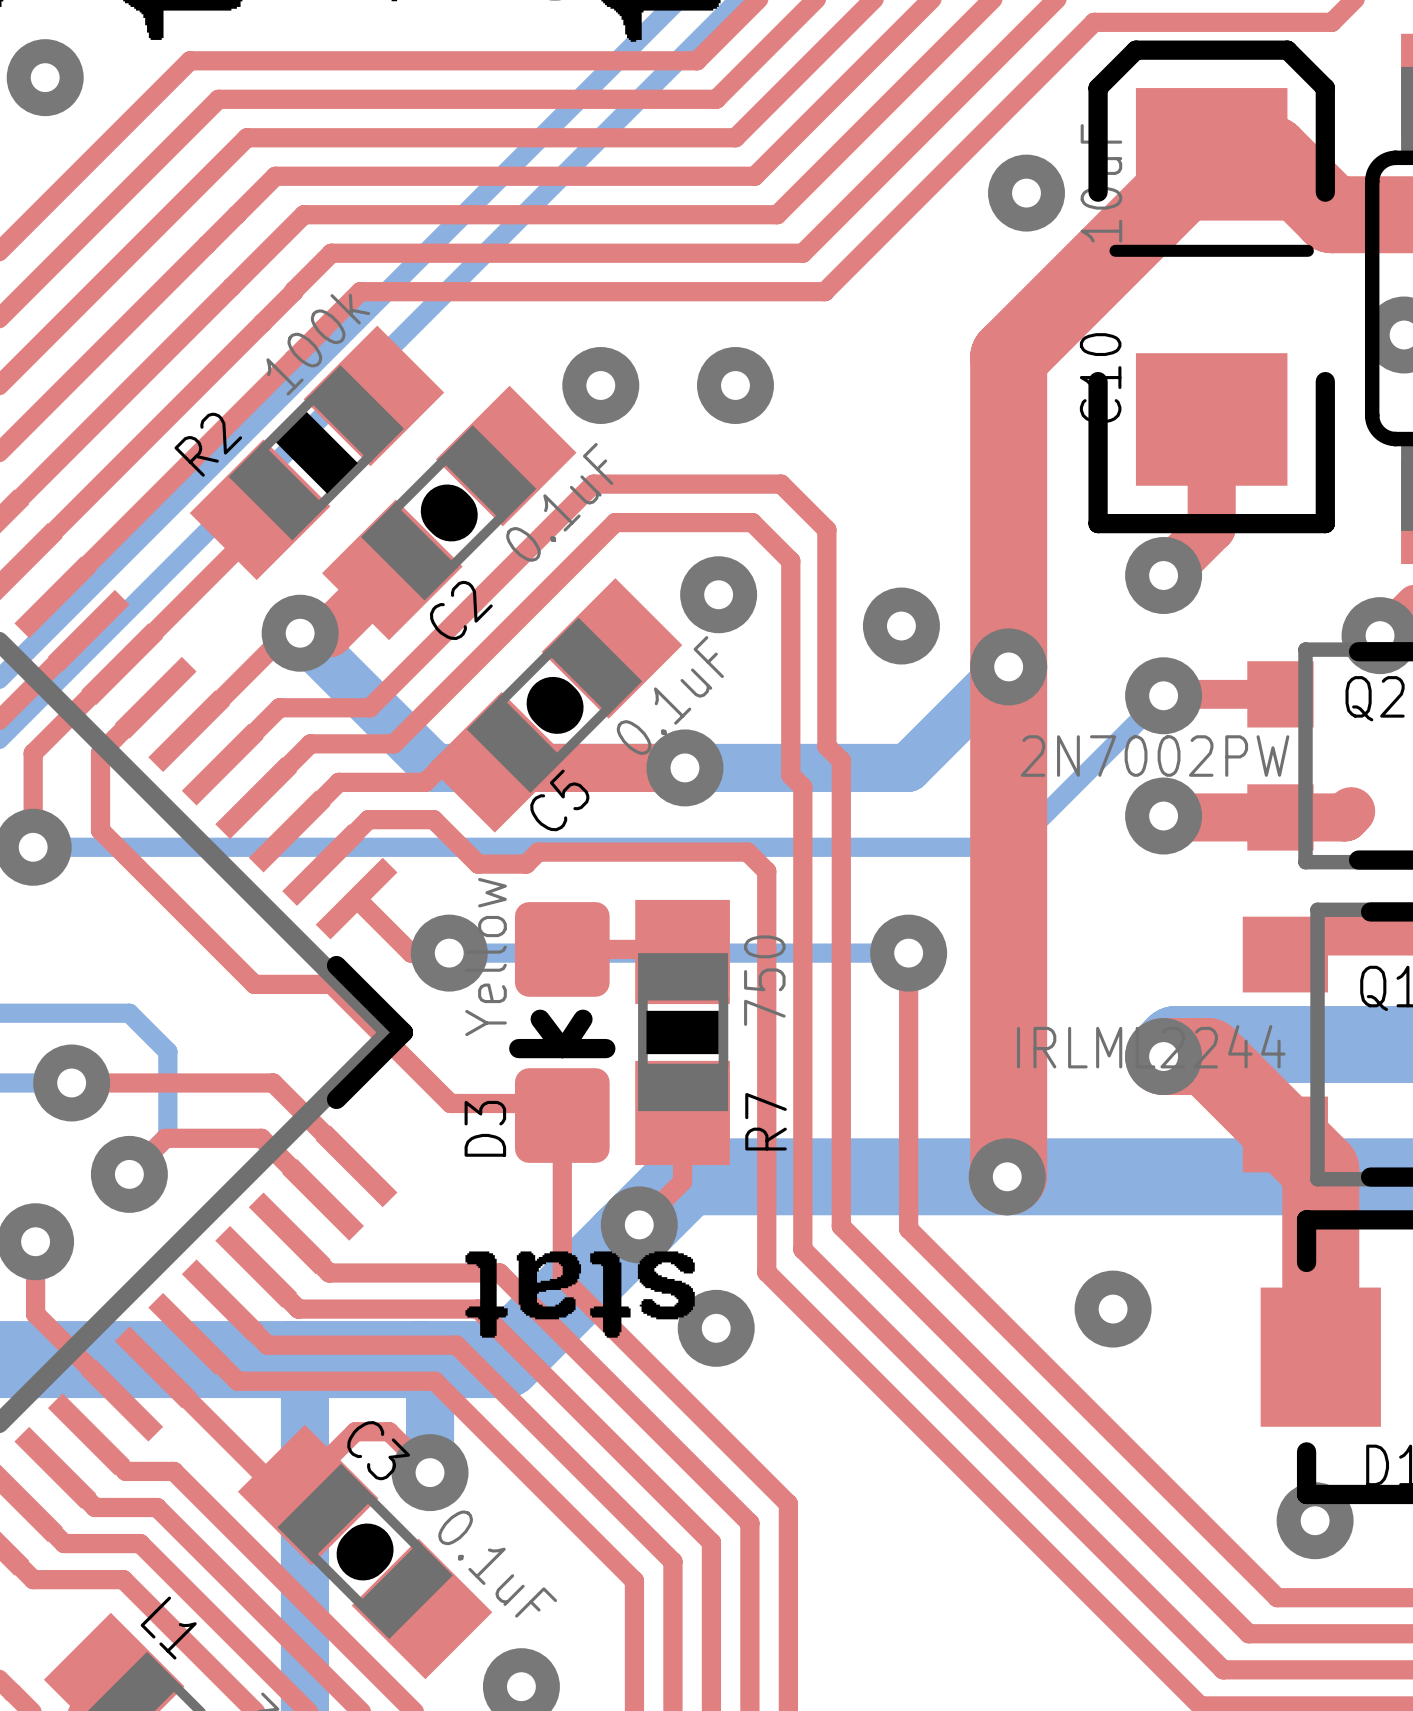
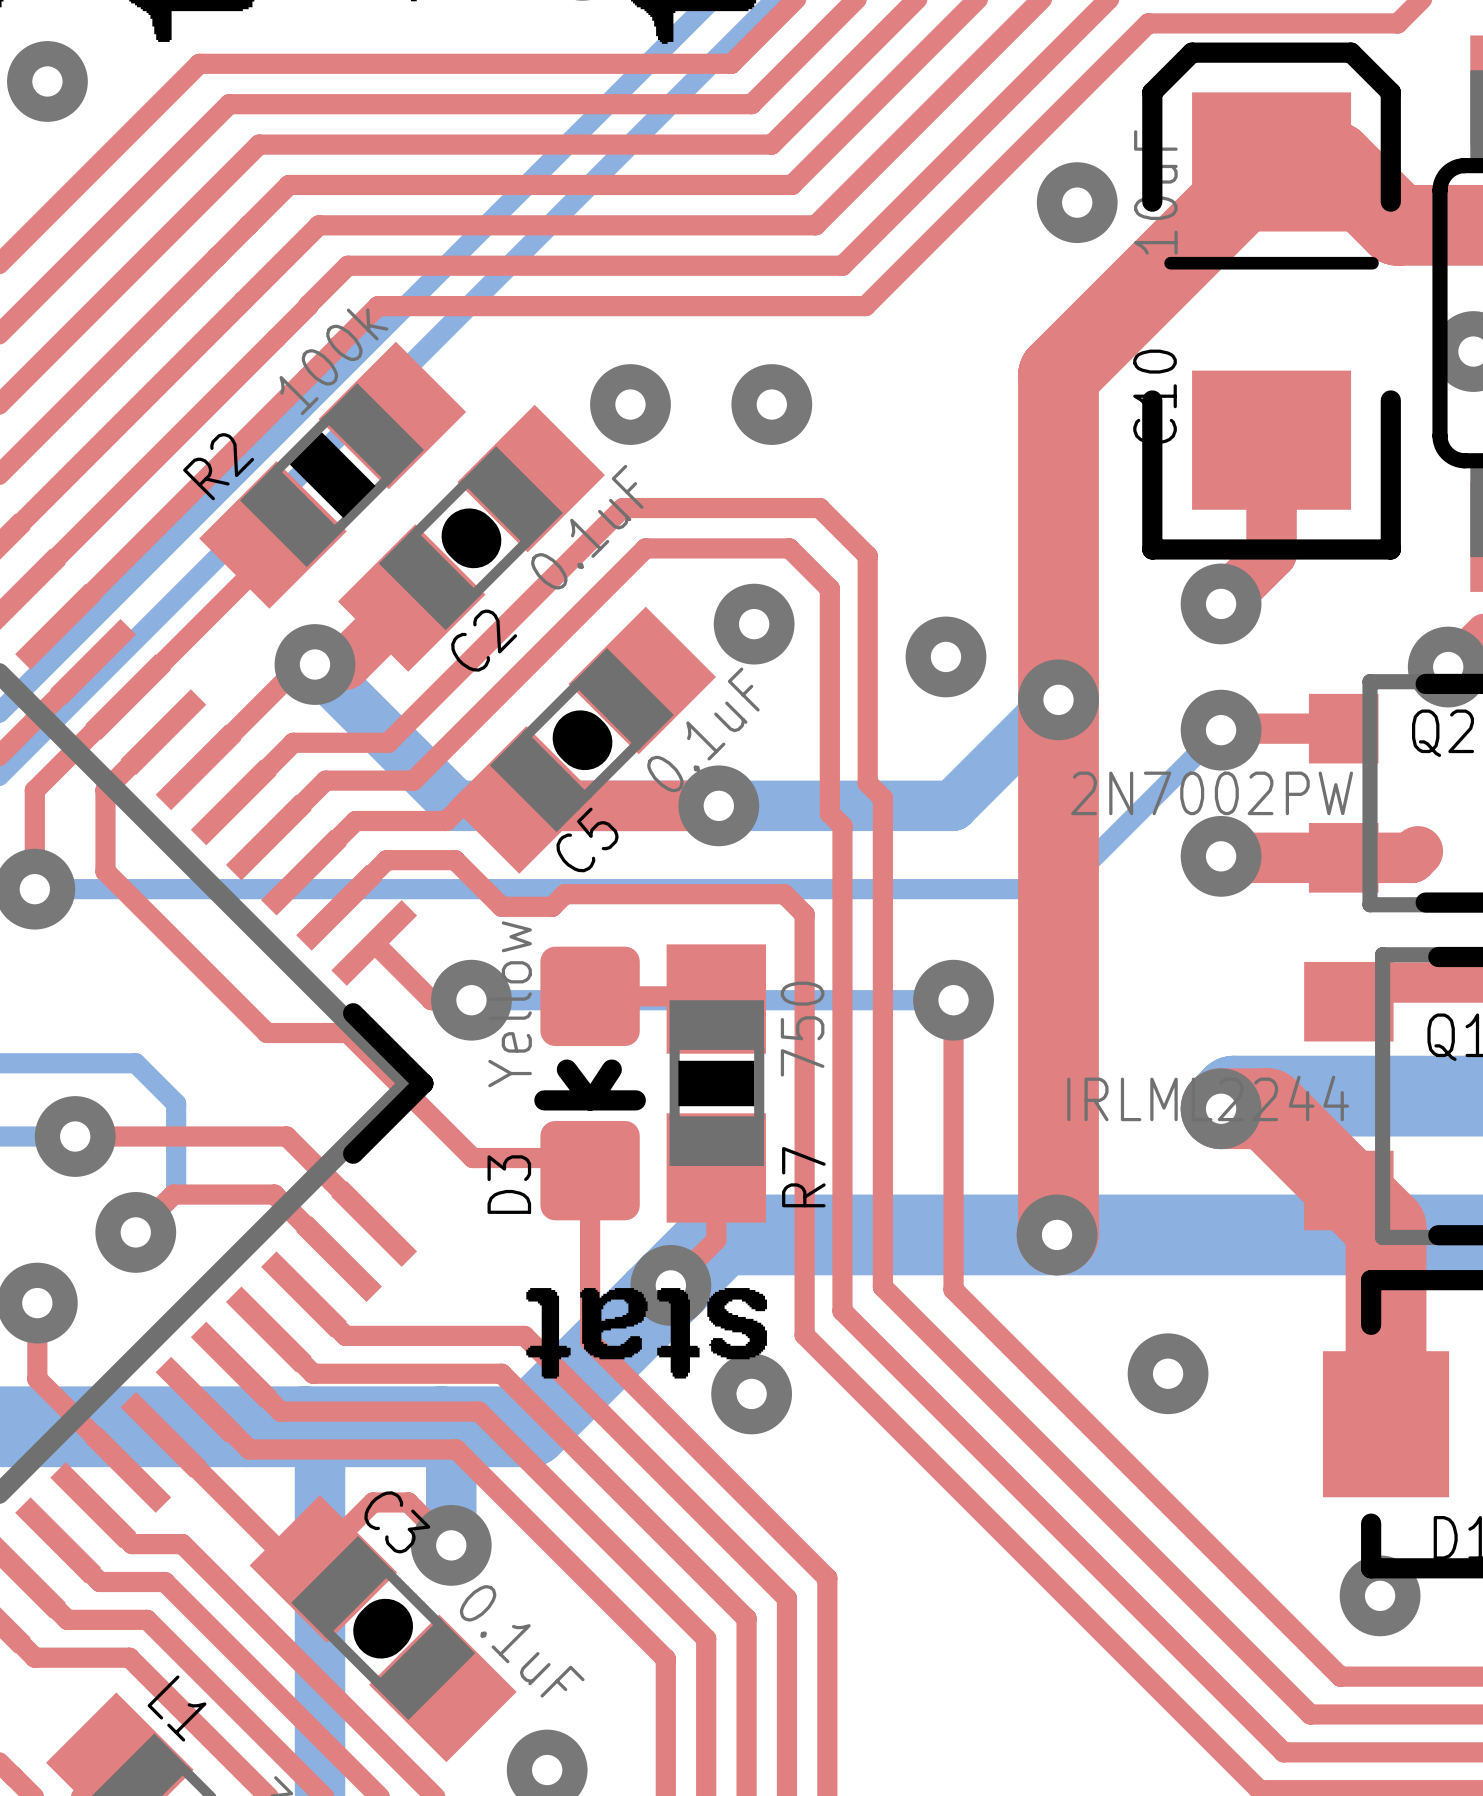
drawing: none -> [526, 1288, 767, 1379]
drawing: [465, 1251, 695, 1338] -> none
drawing position: (519, 1278) -> (583, 1316)
drawing position: (640, 1305) -> (710, 1344)

